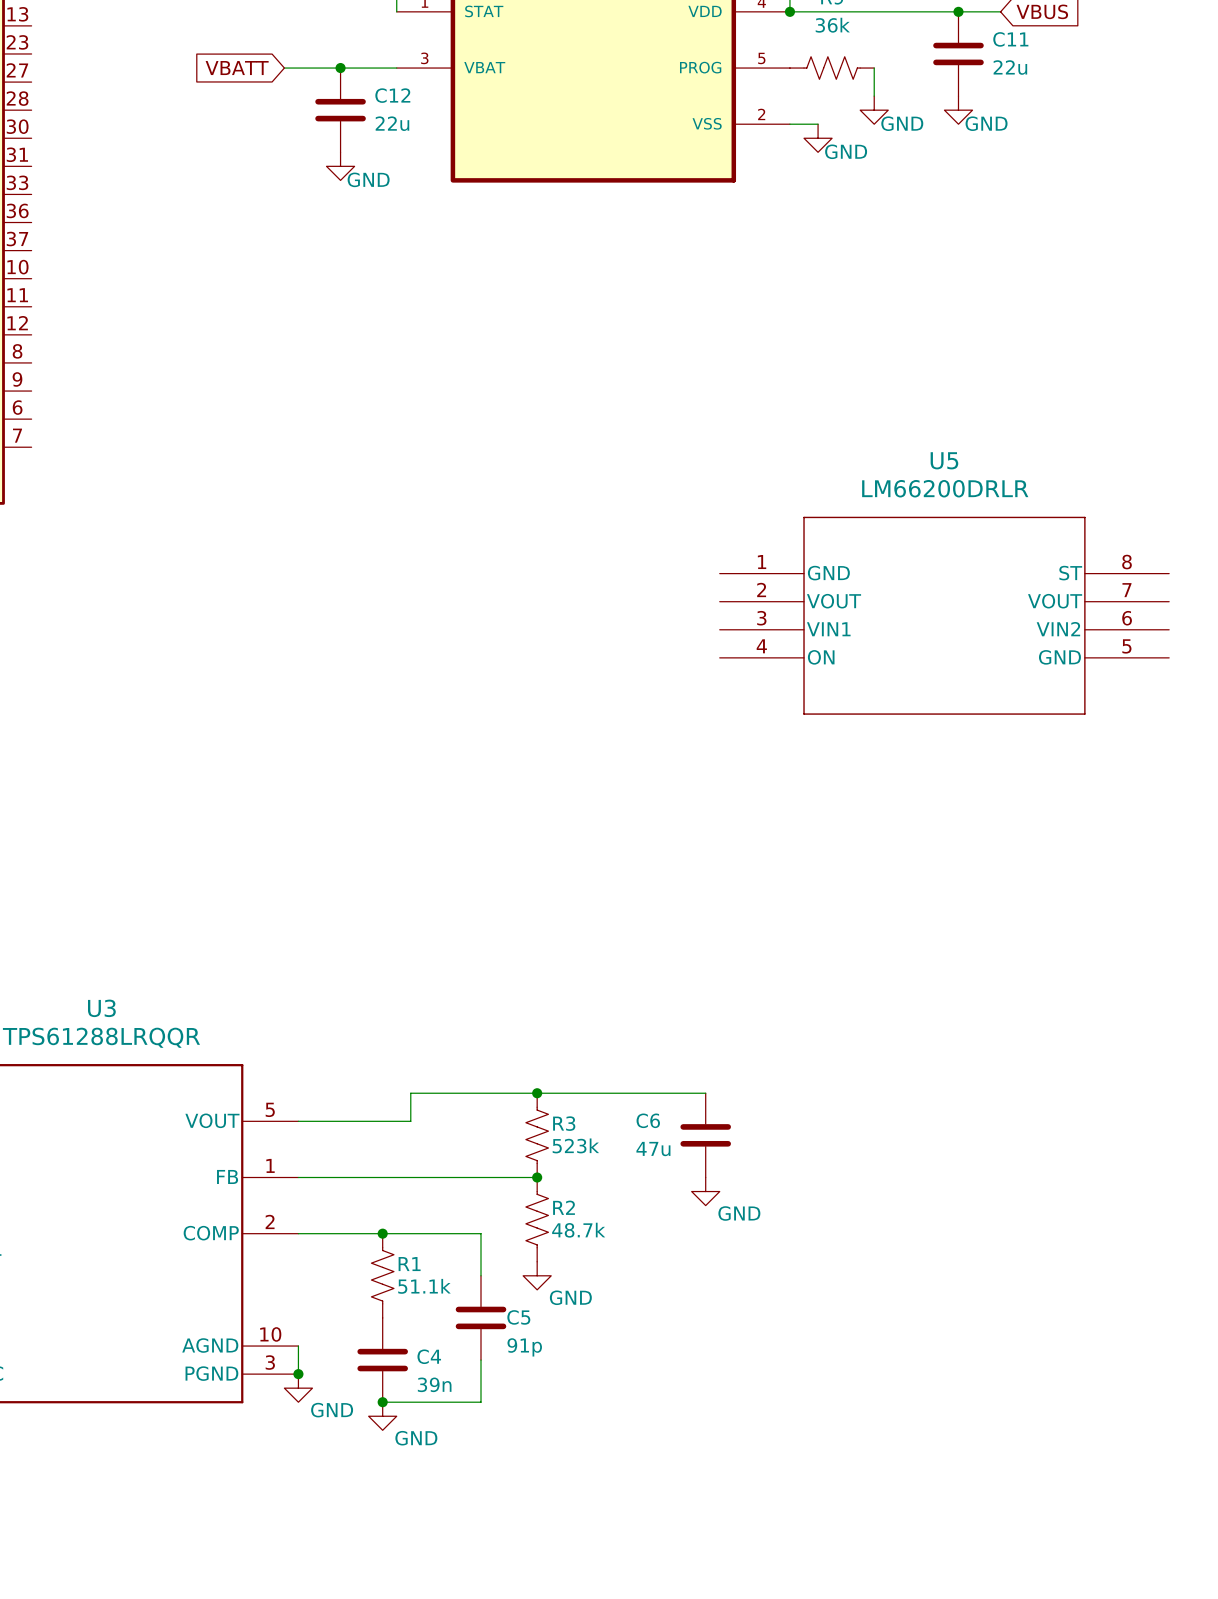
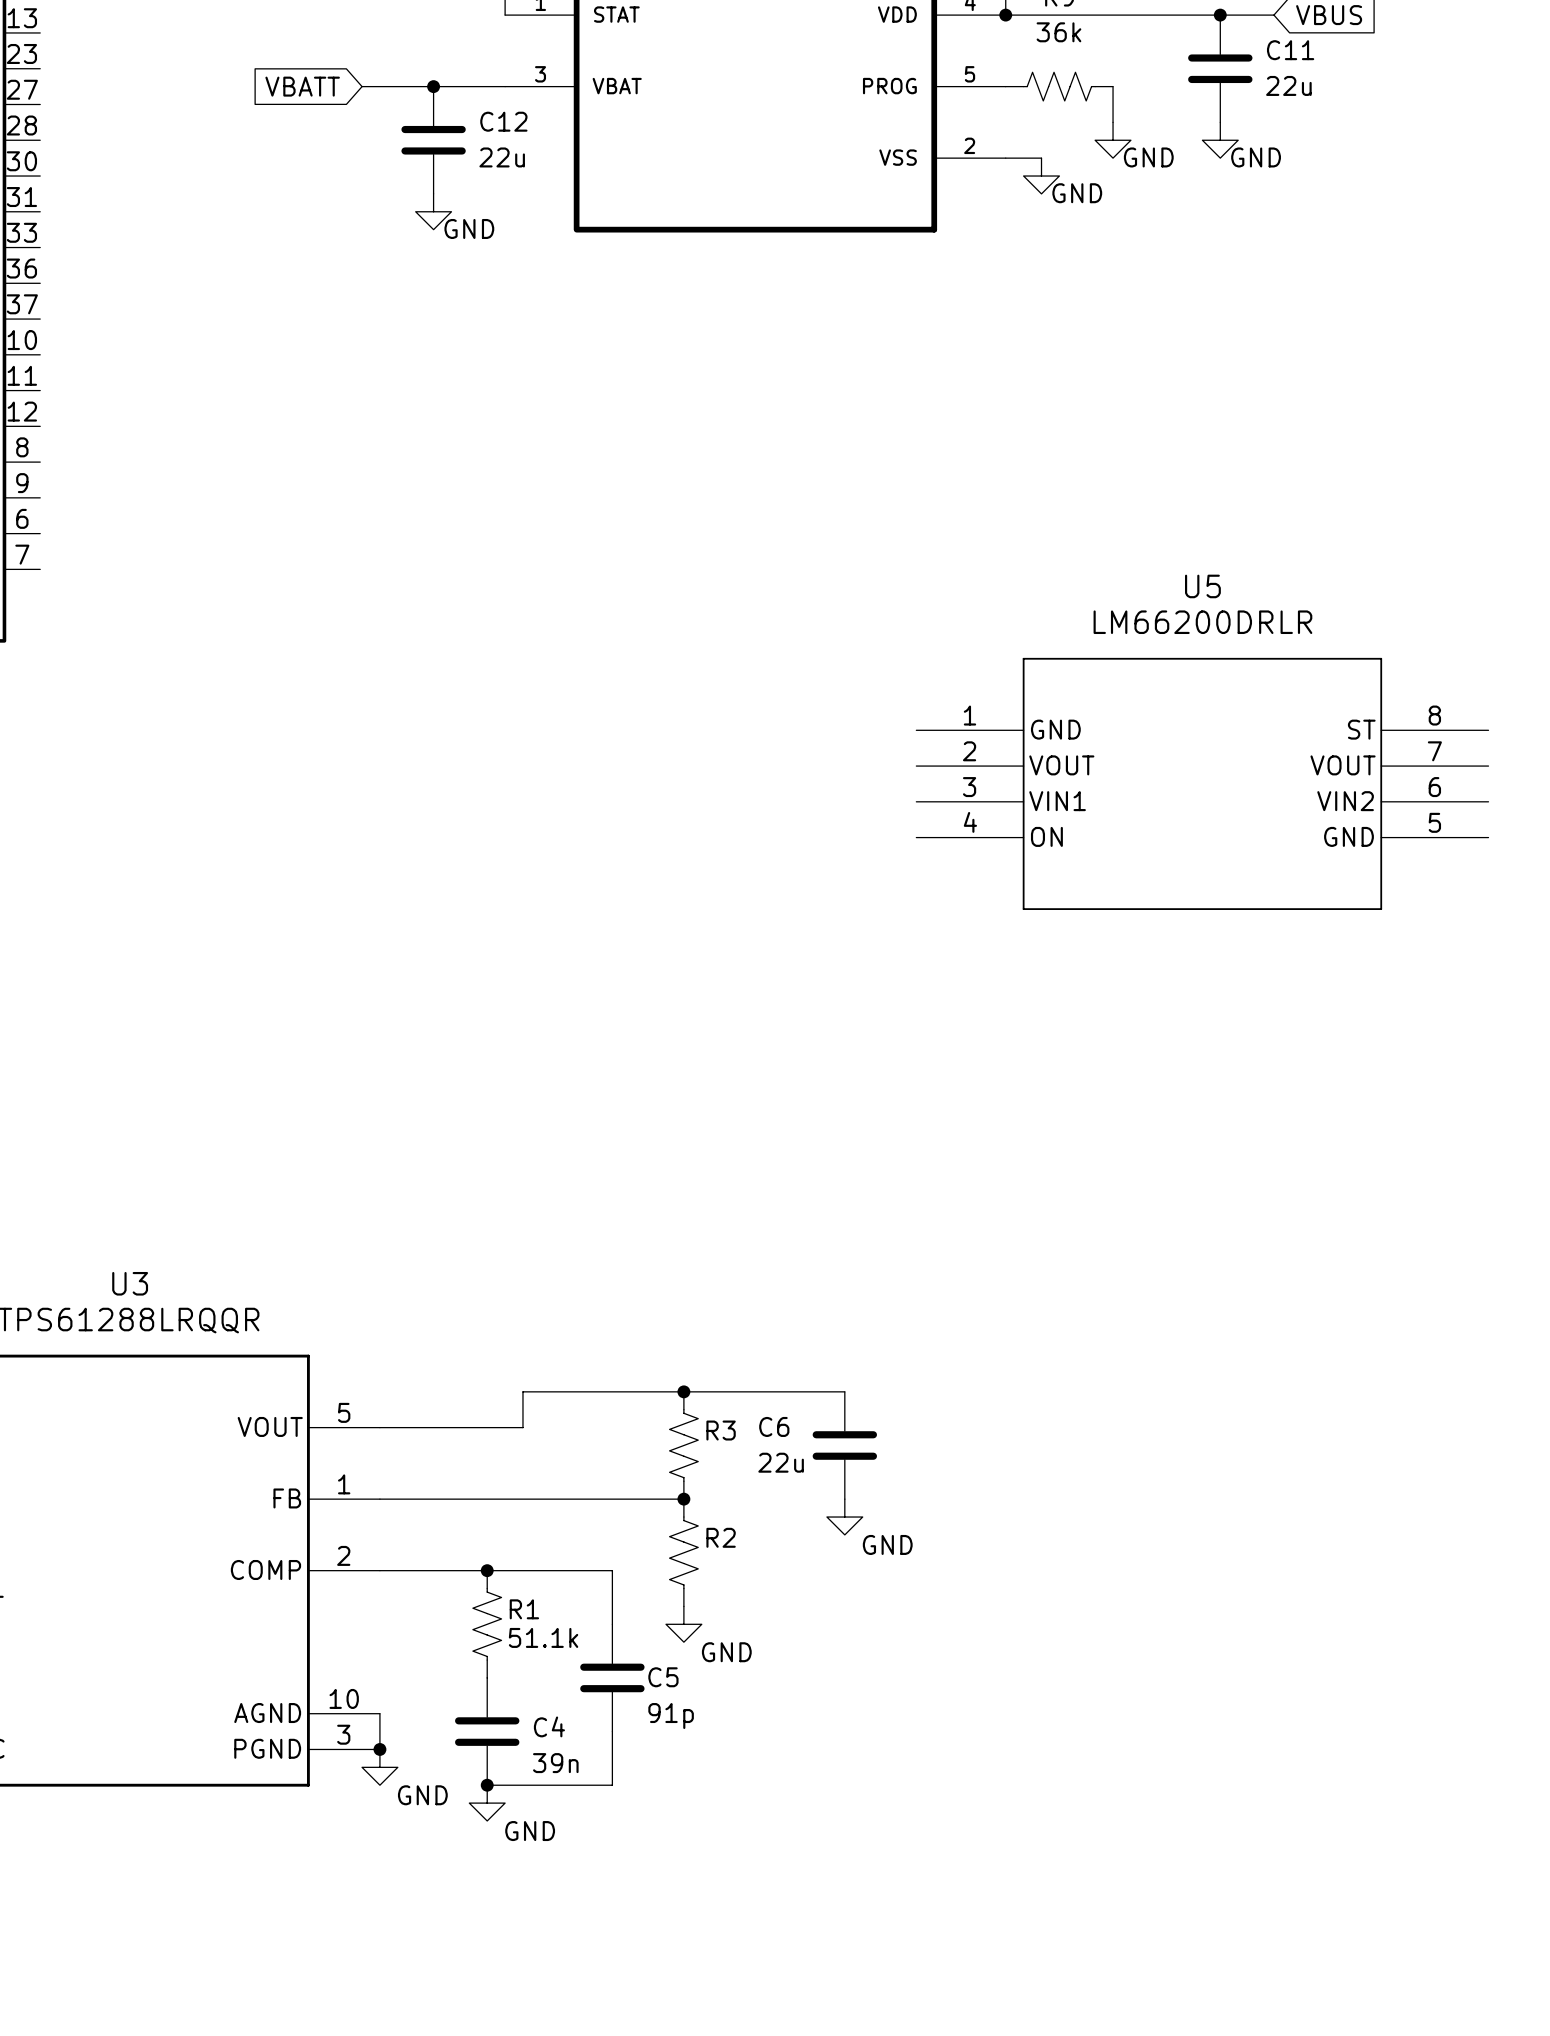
wire: (663, 1093) (705, 1093) -> none
C6 position: (705, 1135) -> (844, 1445)
R3 value: 523k (575, 1145) -> none
C6 value: 47u (653, 1149) -> 22u (781, 1462)
power symbol position: GND (705, 1191) -> GND (844, 1517)
R2 value: 48.7k (578, 1230) -> none

